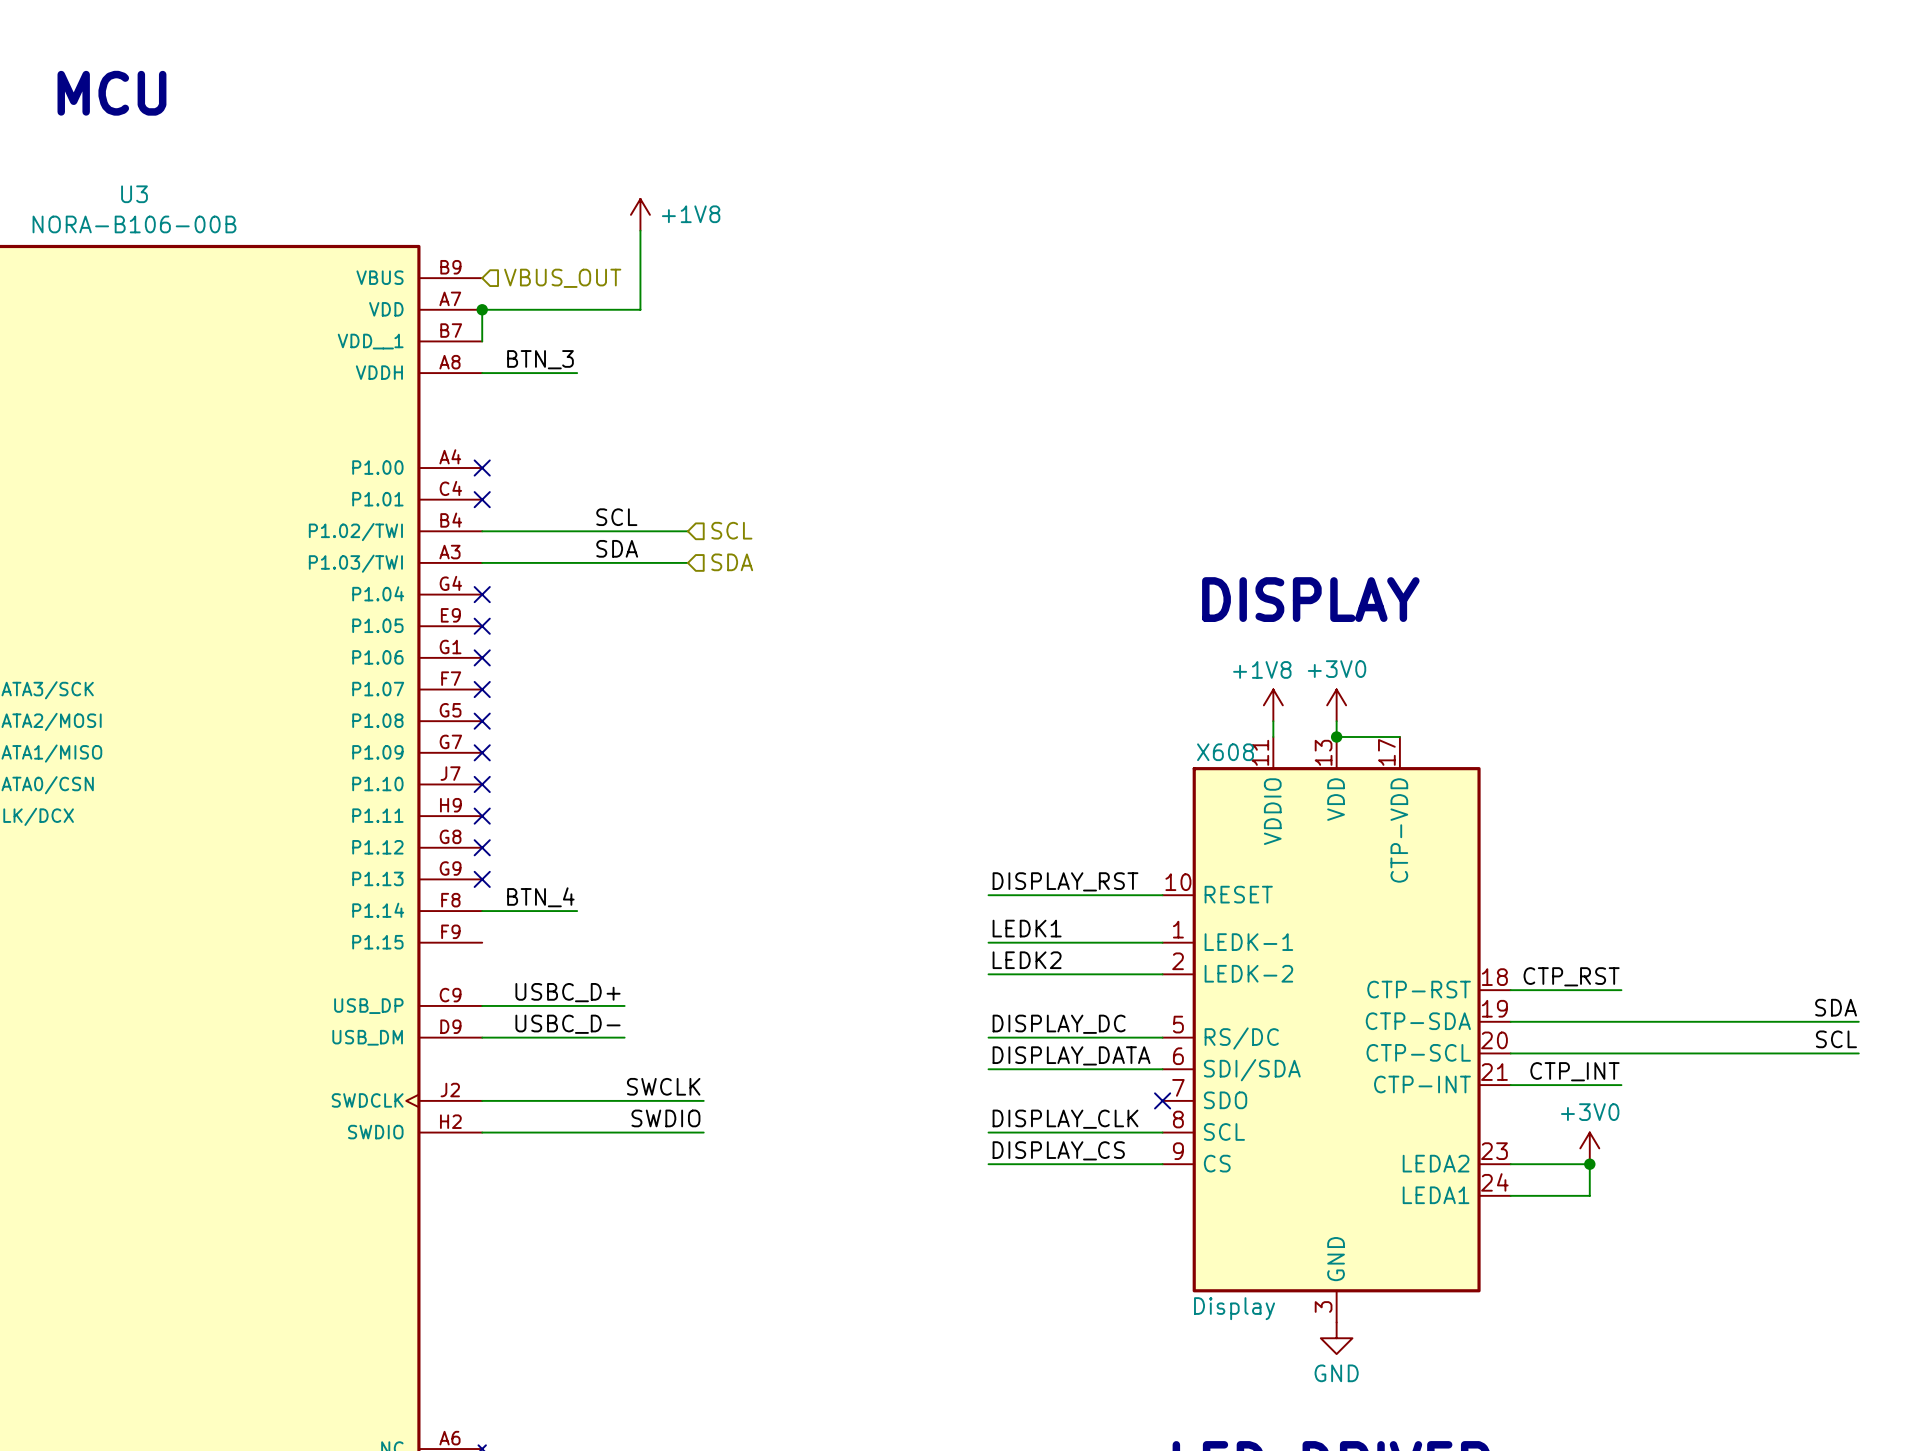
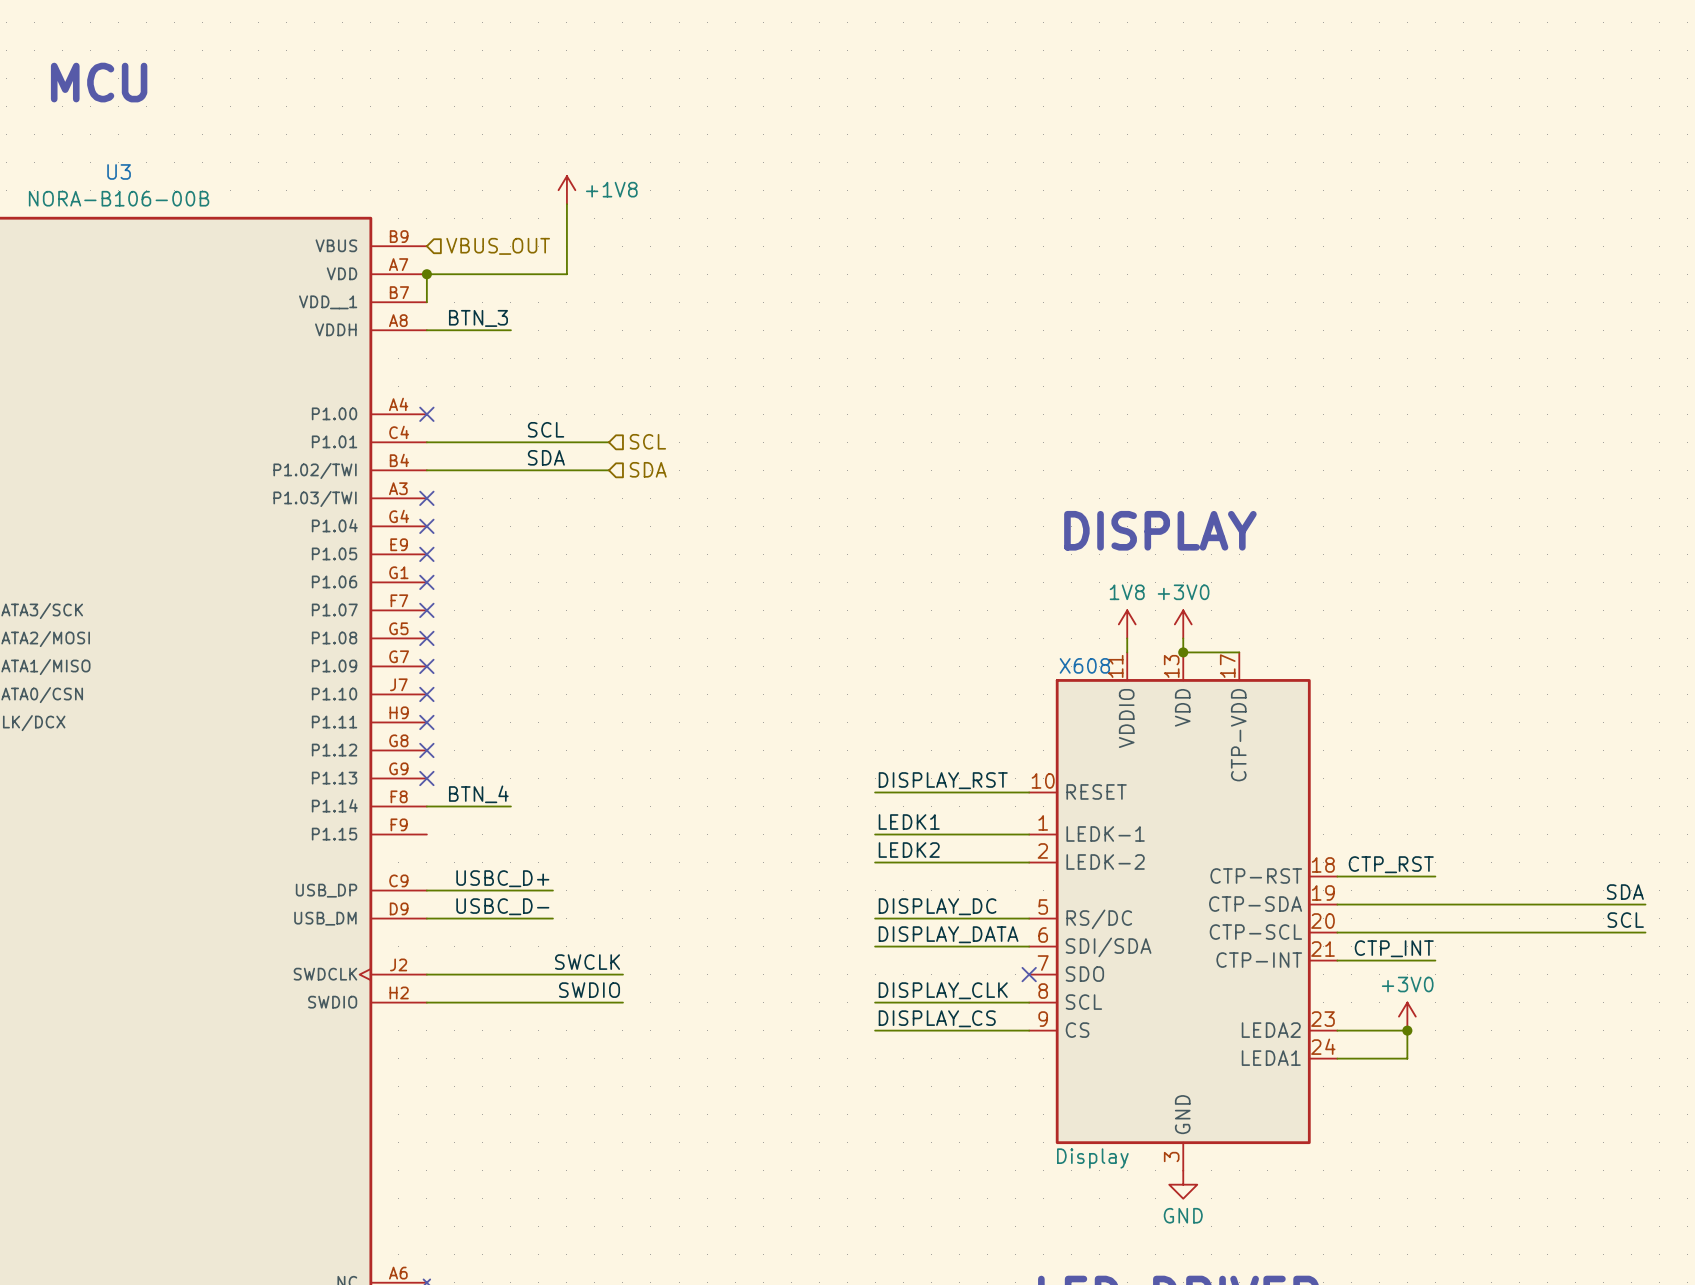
label: none -> SCL (546, 429)
no-connect mark position: (482, 499) -> (426, 498)
hierarchical label: none -> SCL (647, 441)
label: SCL (616, 517) -> SDA (546, 457)
hierarchical label: SCL (731, 530) -> SDA (648, 469)
label: SDA (617, 548) -> none
wire: (482, 562) (687, 562) -> (426, 442) (608, 442)
hierarchical label: SDA (732, 562) -> none
power symbol: +1V8 (1273, 705) -> 1V8 (1127, 624)

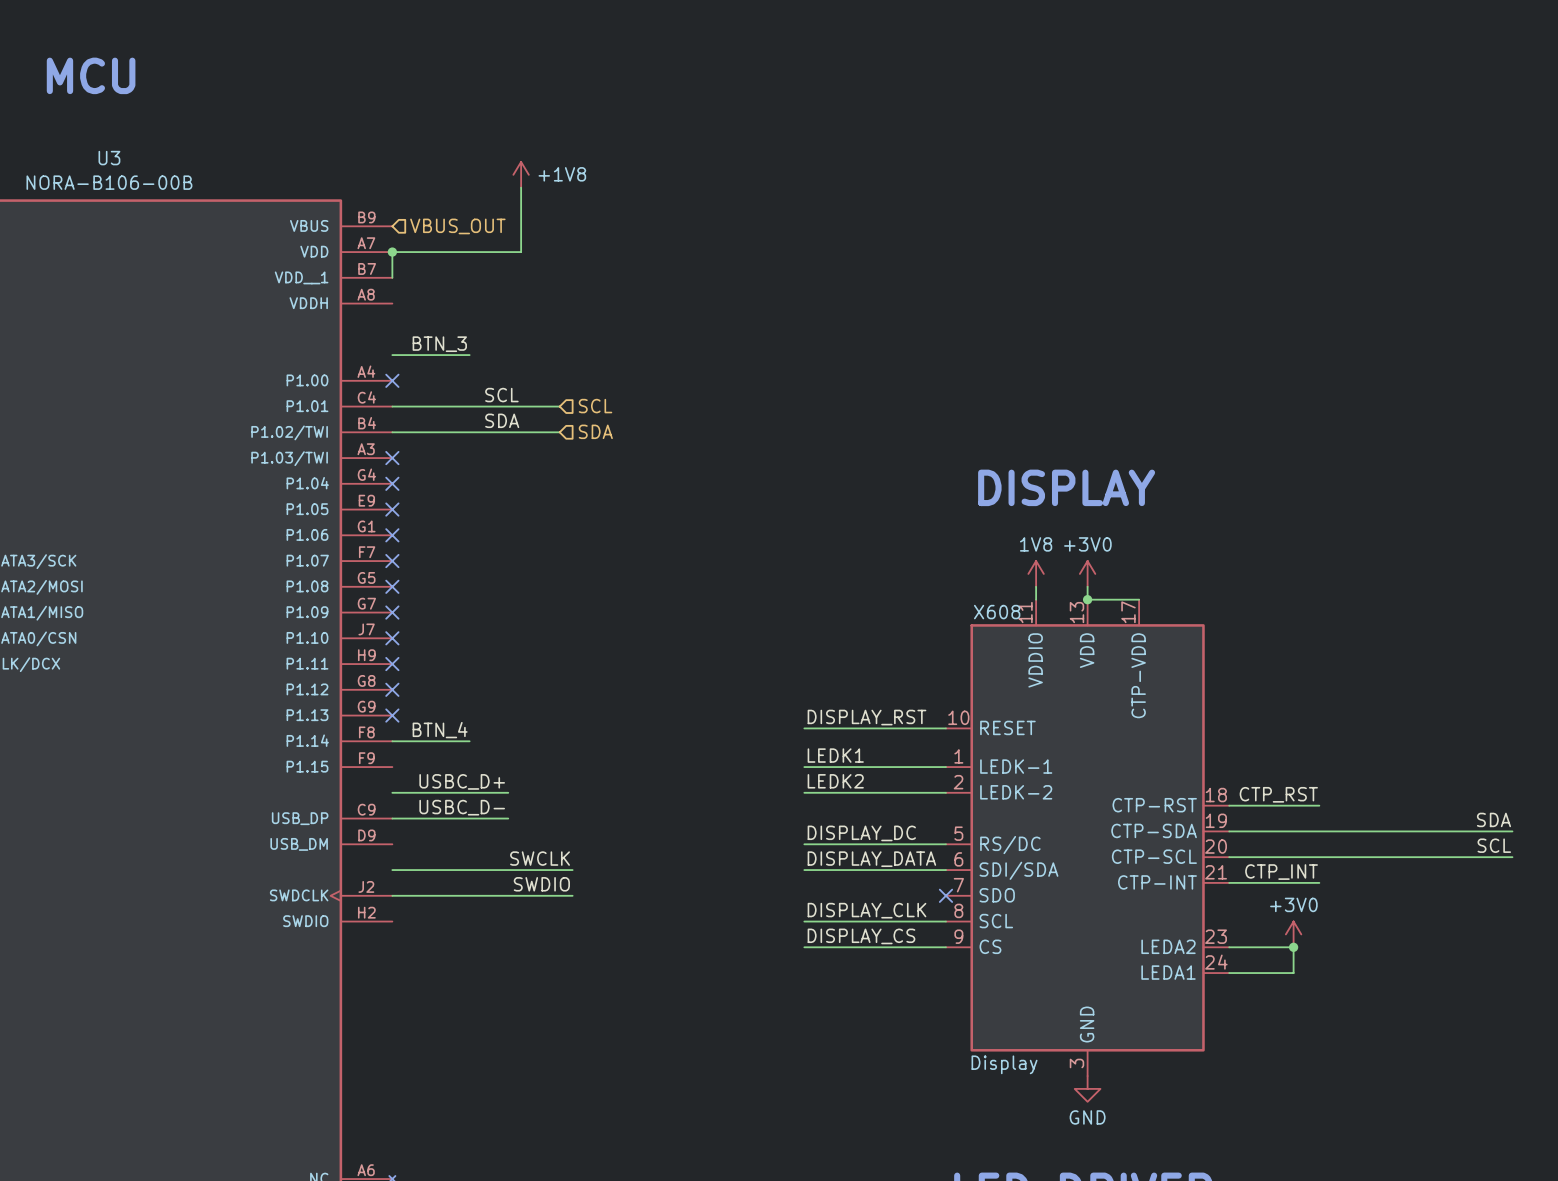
label position: BTN_3 (478, 318) -> BTN_3 (439, 344)
wire: (426, 330) (510, 330) -> (392, 355) (469, 355)
label: none -> USBC_D+ (462, 781)
label: USBC_D+ (502, 878) -> USBC_D- (462, 807)
label: USBC_D- (502, 906) -> none
wire: (426, 918) (552, 918) -> (392, 792) (508, 792)
label: none -> SWCLK (540, 858)
label: SWCLK (587, 962) -> SWDIO (541, 884)
label: SWDIO (589, 990) -> none
wire: (426, 1002) (622, 1002) -> (392, 870) (572, 870)

